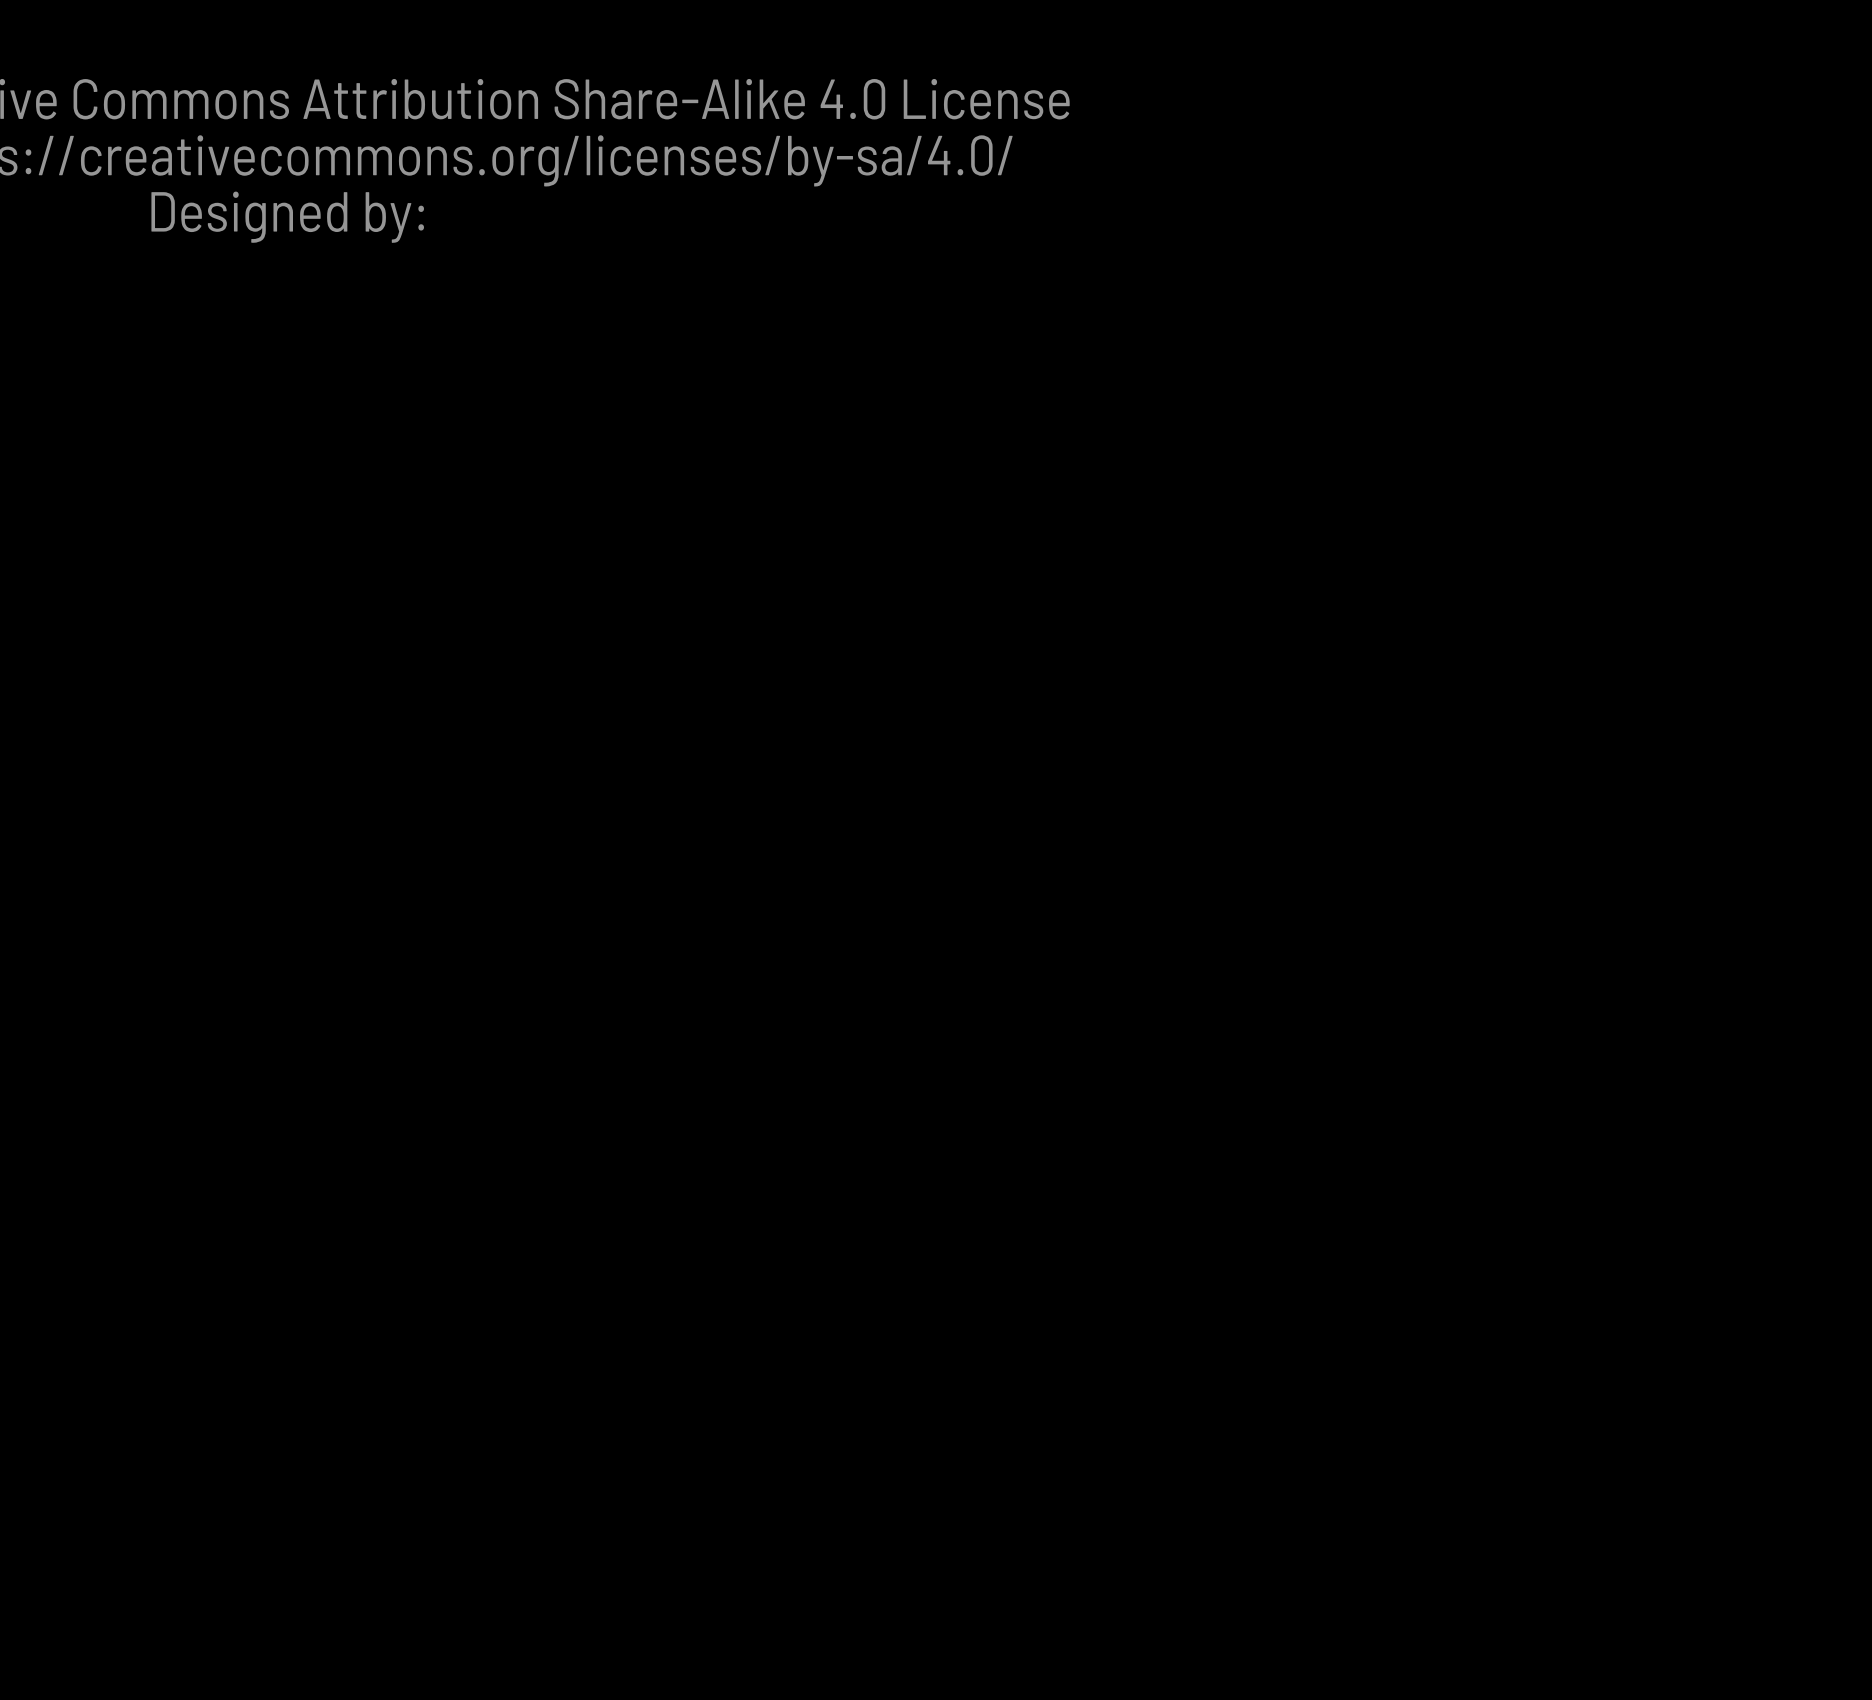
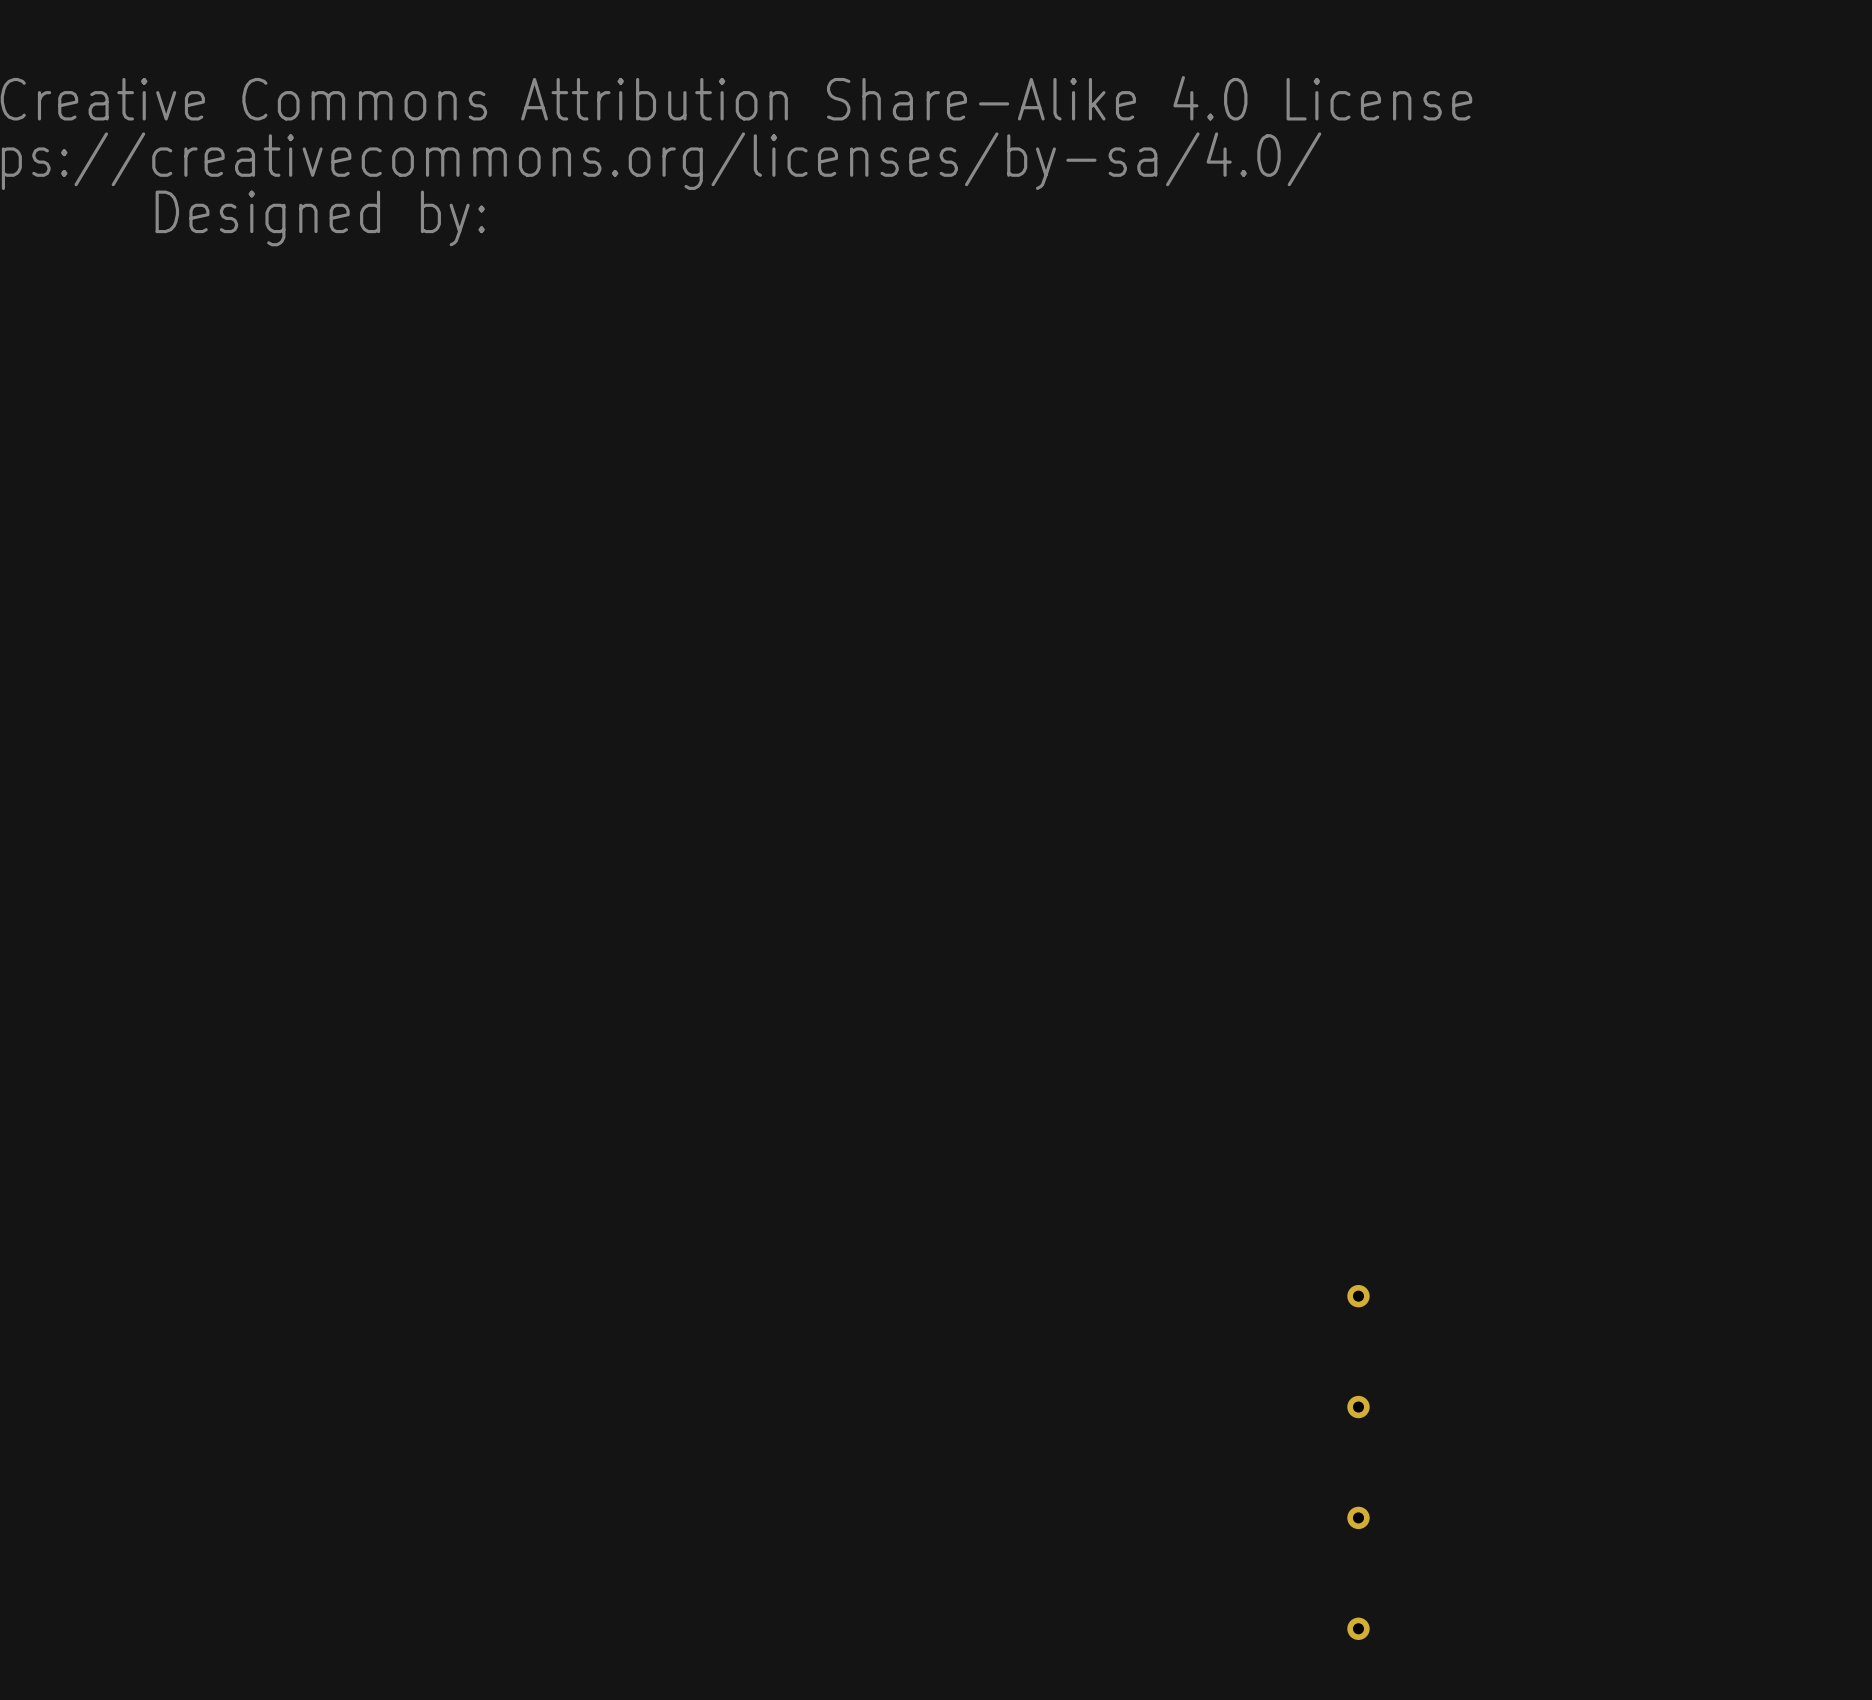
part: none -> (1358, 1296)
part: none -> (1358, 1407)
part: none -> (1358, 1517)
part: none -> (1358, 1628)

